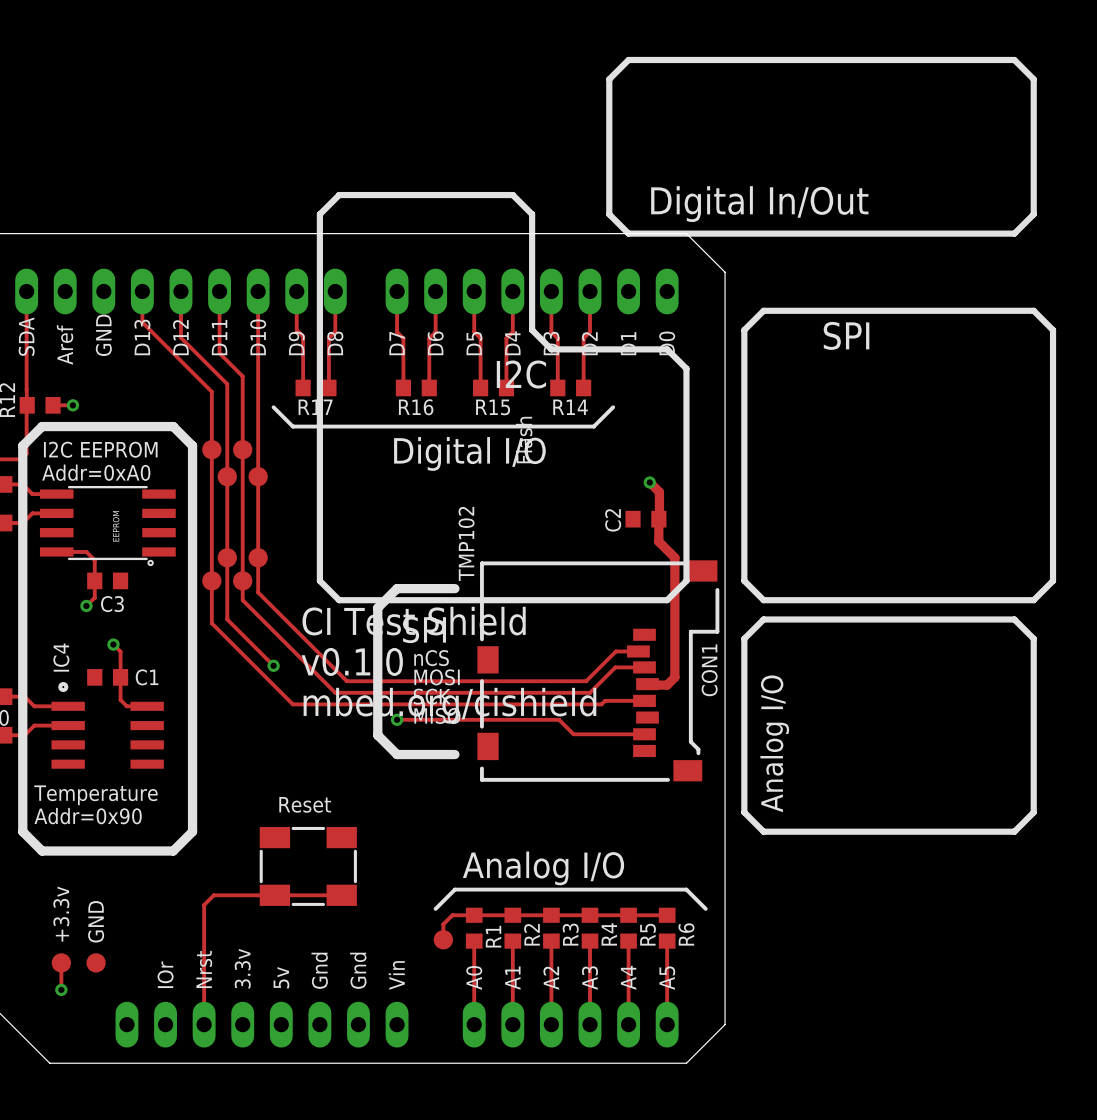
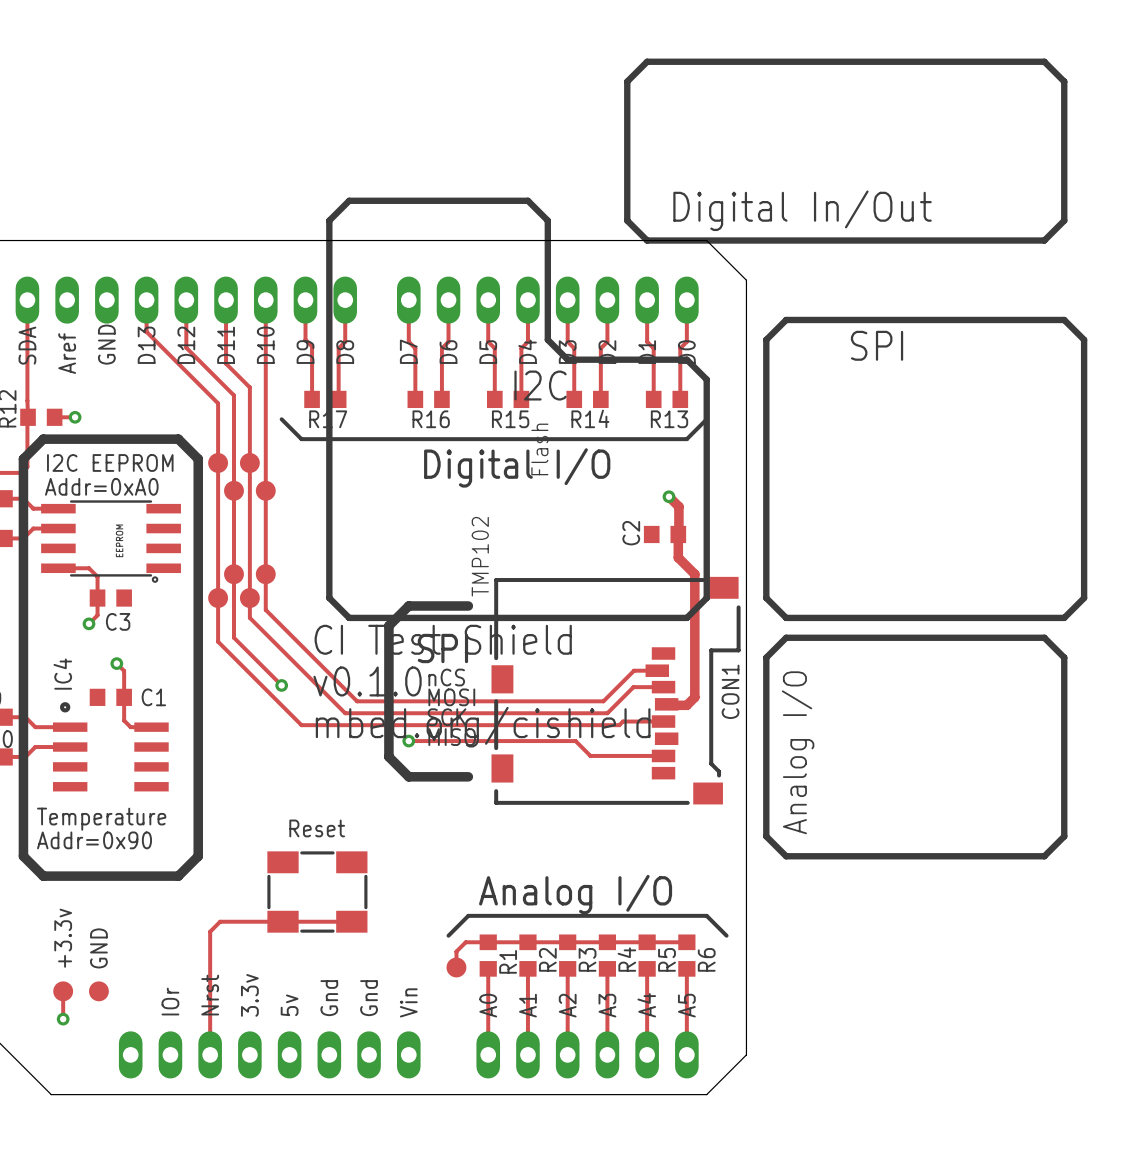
track: none -> (647, 300) (647, 341) (653, 348) (653, 399)
track: none -> (686, 300) (686, 341) (680, 348) (680, 399)
R13: none -> (667, 399)
line: (613, 407) (593, 426) -> (706, 419) (686, 439) (611, 439)
text position: Digital I/O (469, 453) -> Digital I/O (517, 467)

